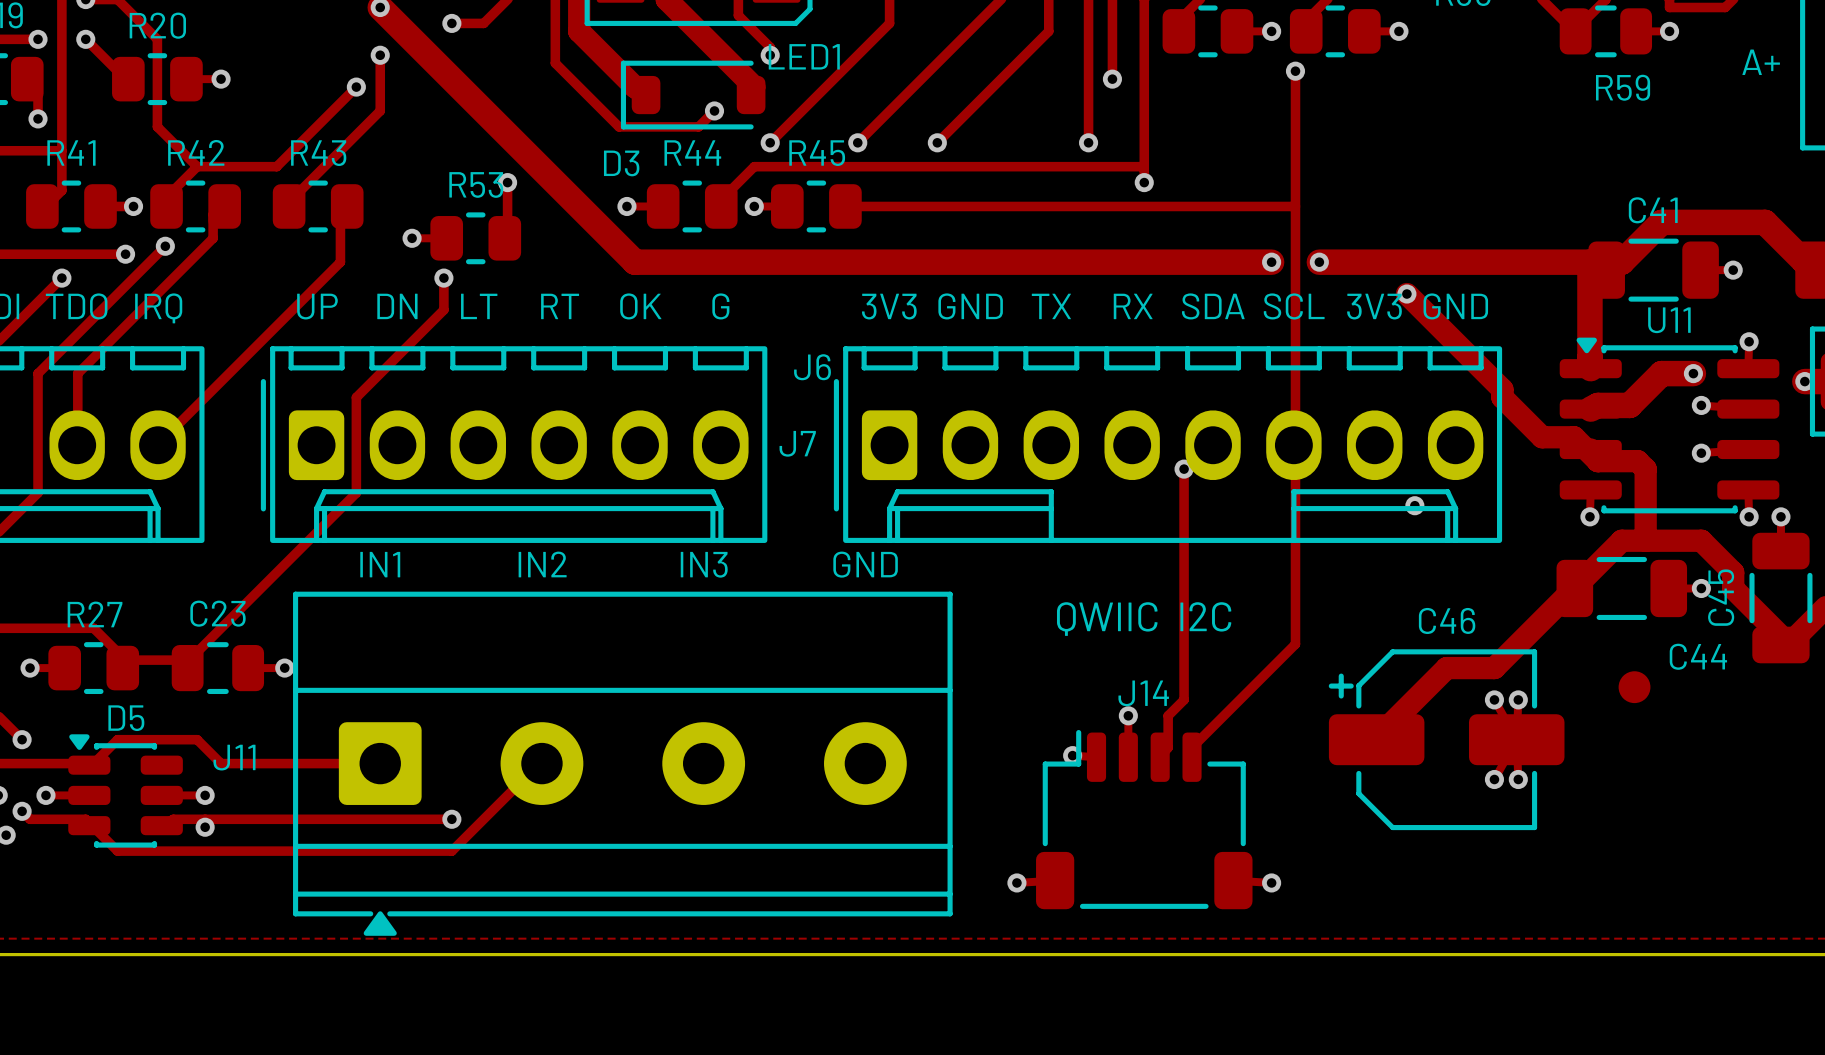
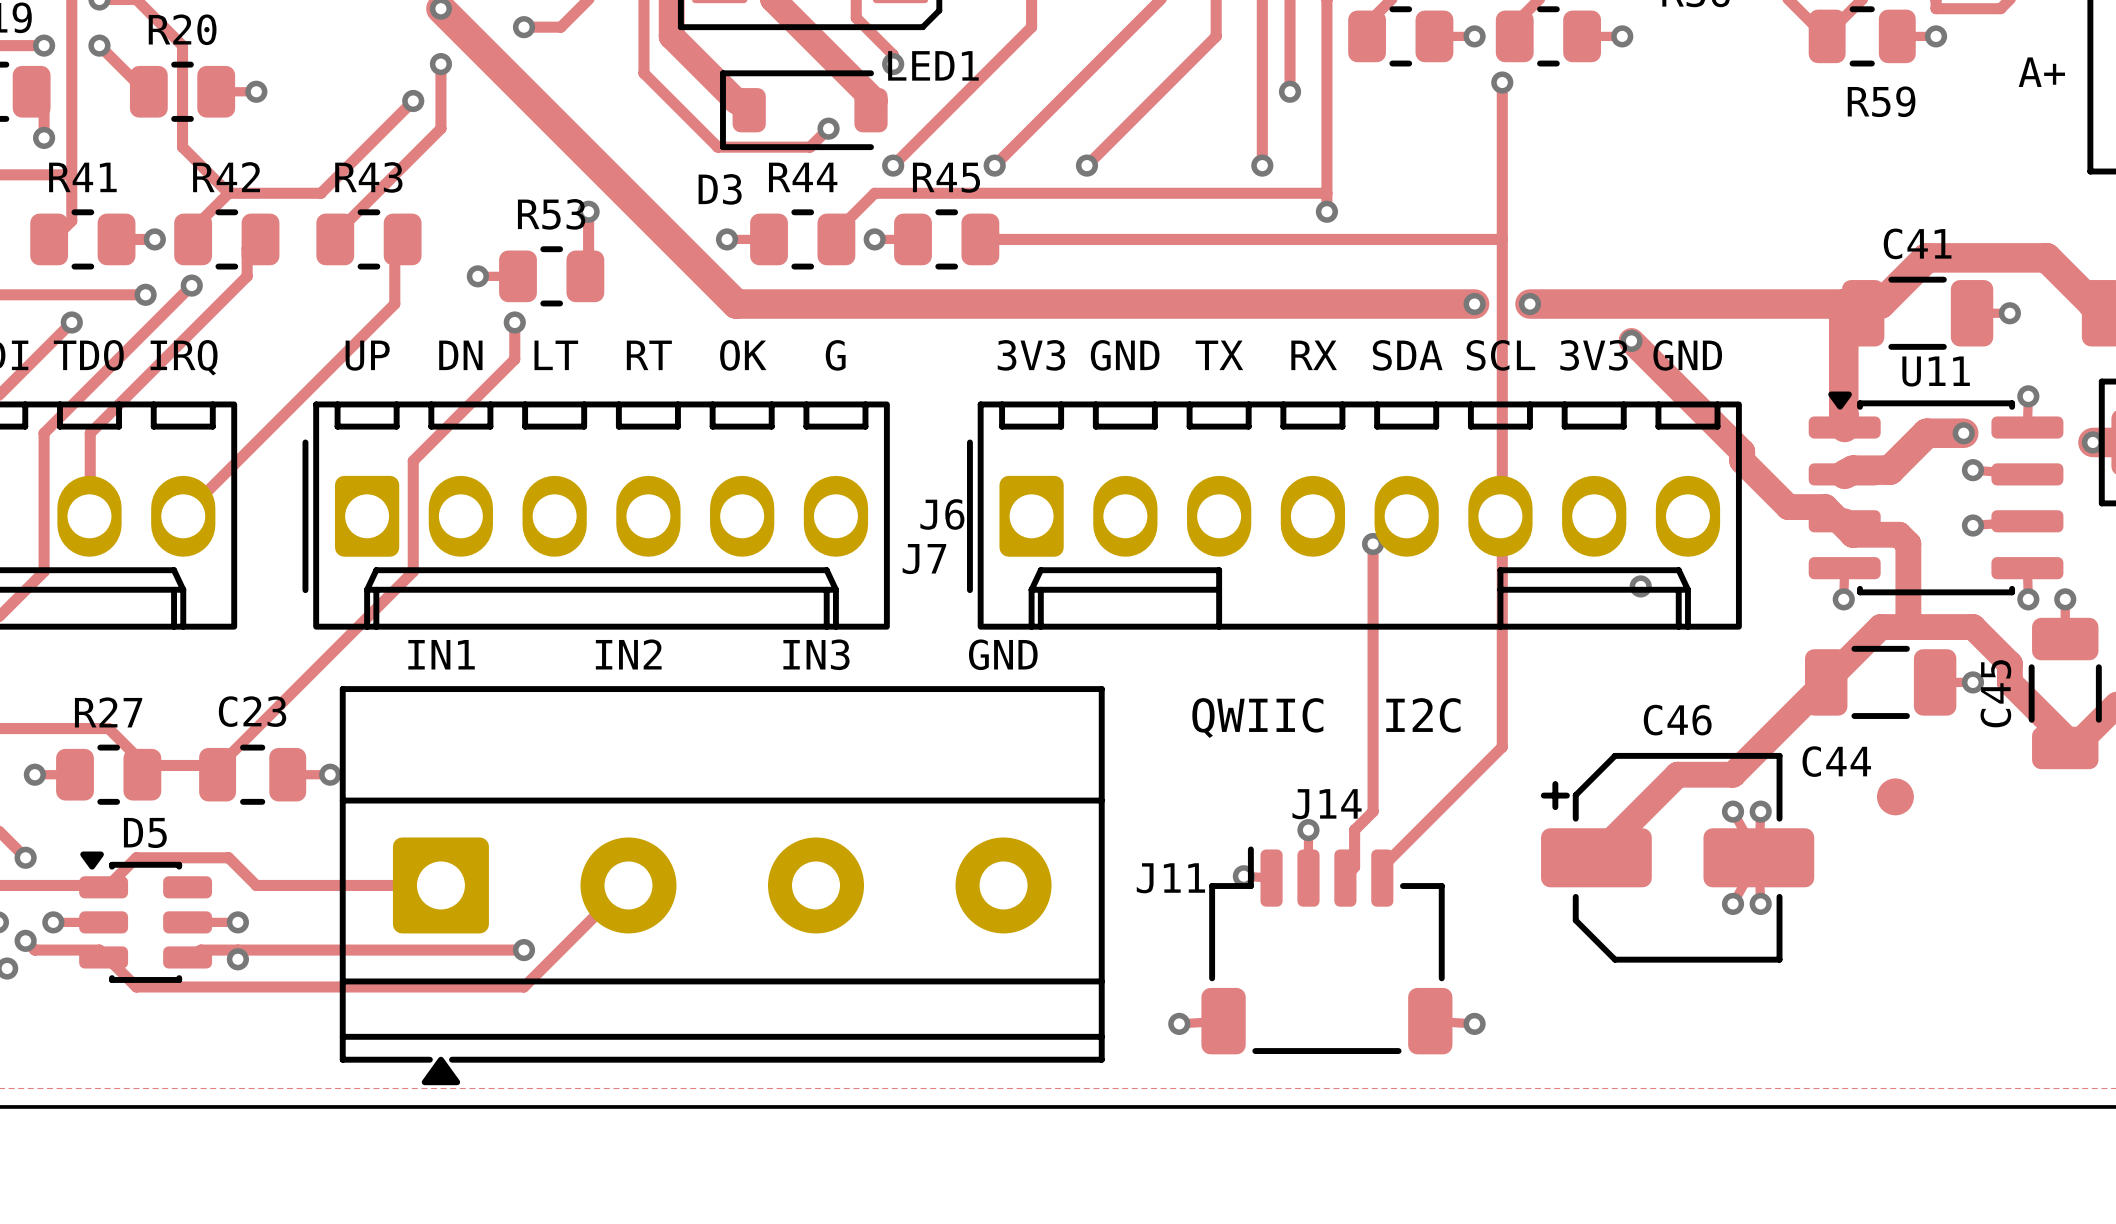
J6 name position: J6 (812, 367) -> J6 (942, 514)
J7 name position: J7 (797, 443) -> J7 (924, 559)
C44 name position: C44 (1698, 656) -> C44 (1836, 761)
J11 name position: J11 (234, 757) -> J11 (1170, 878)

